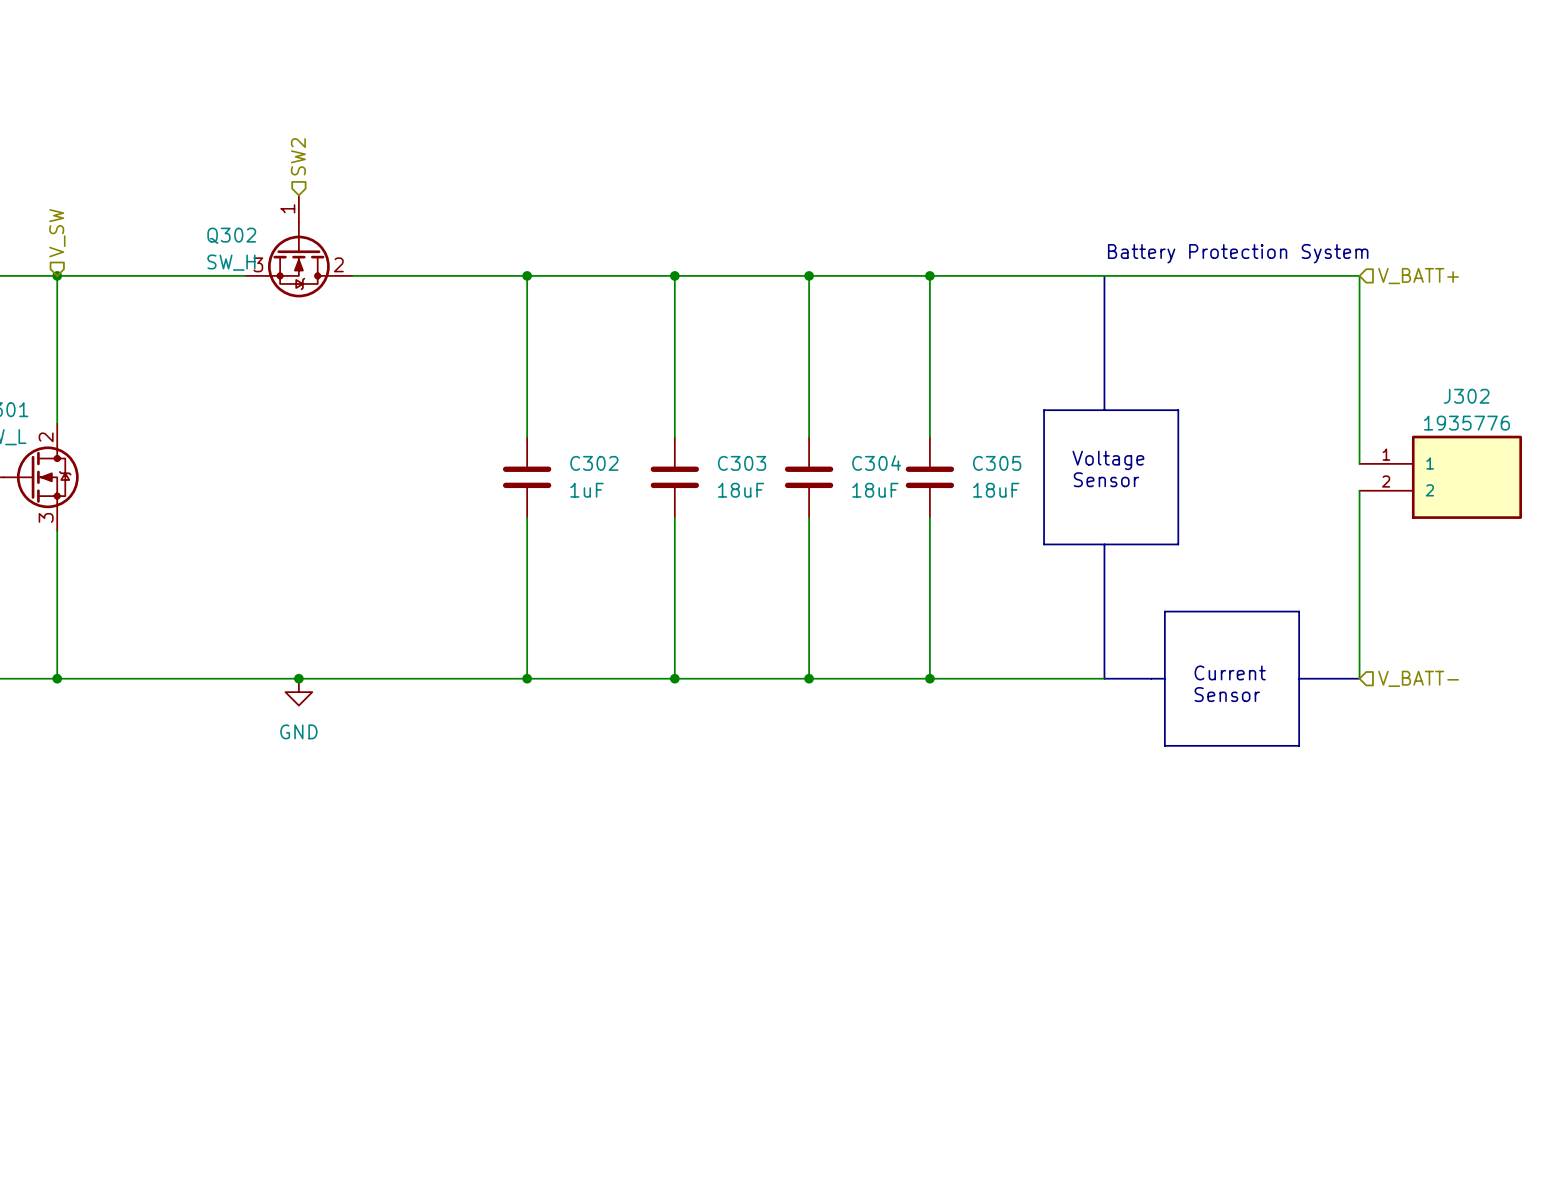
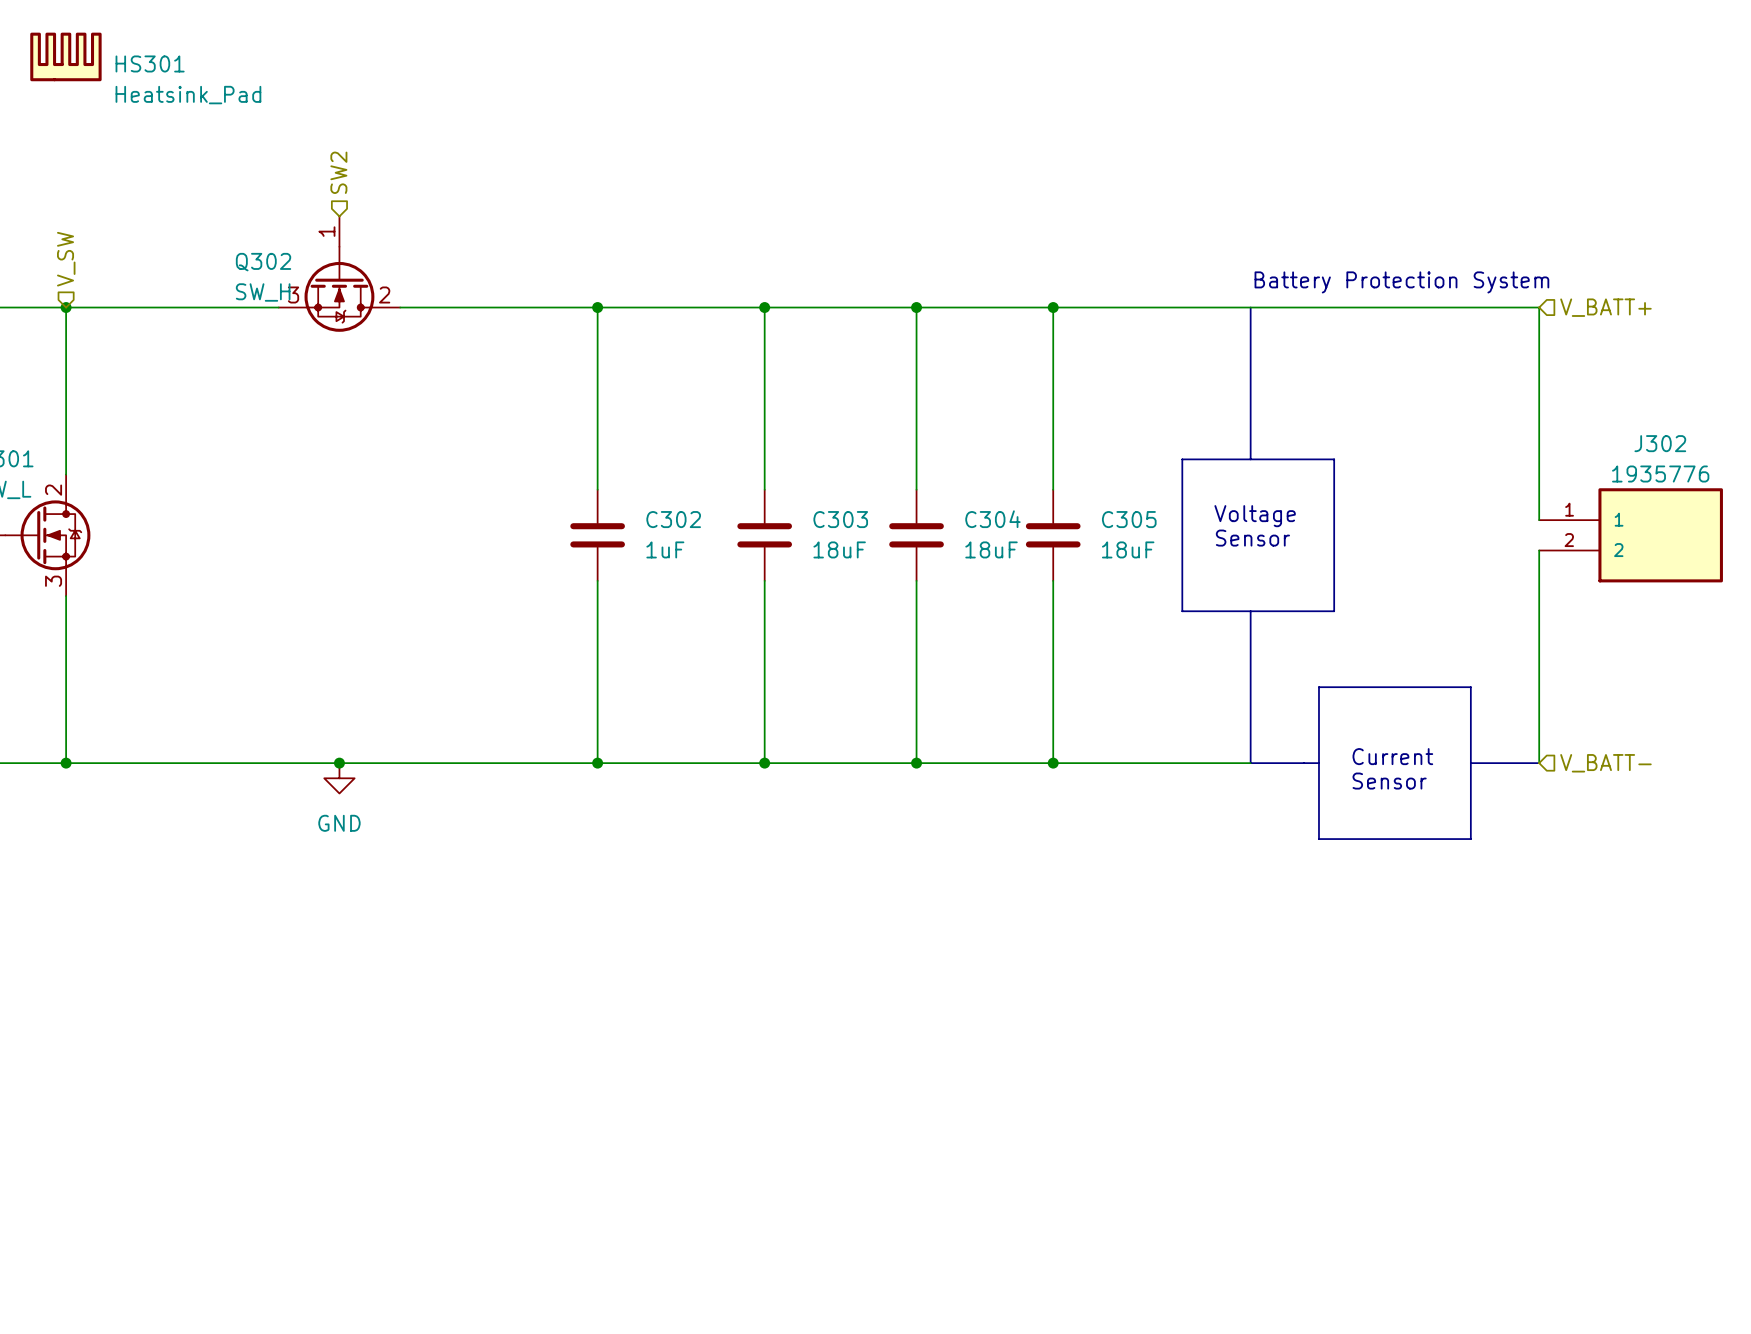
HS301: none -> Heatsink_Pad (65, 56)

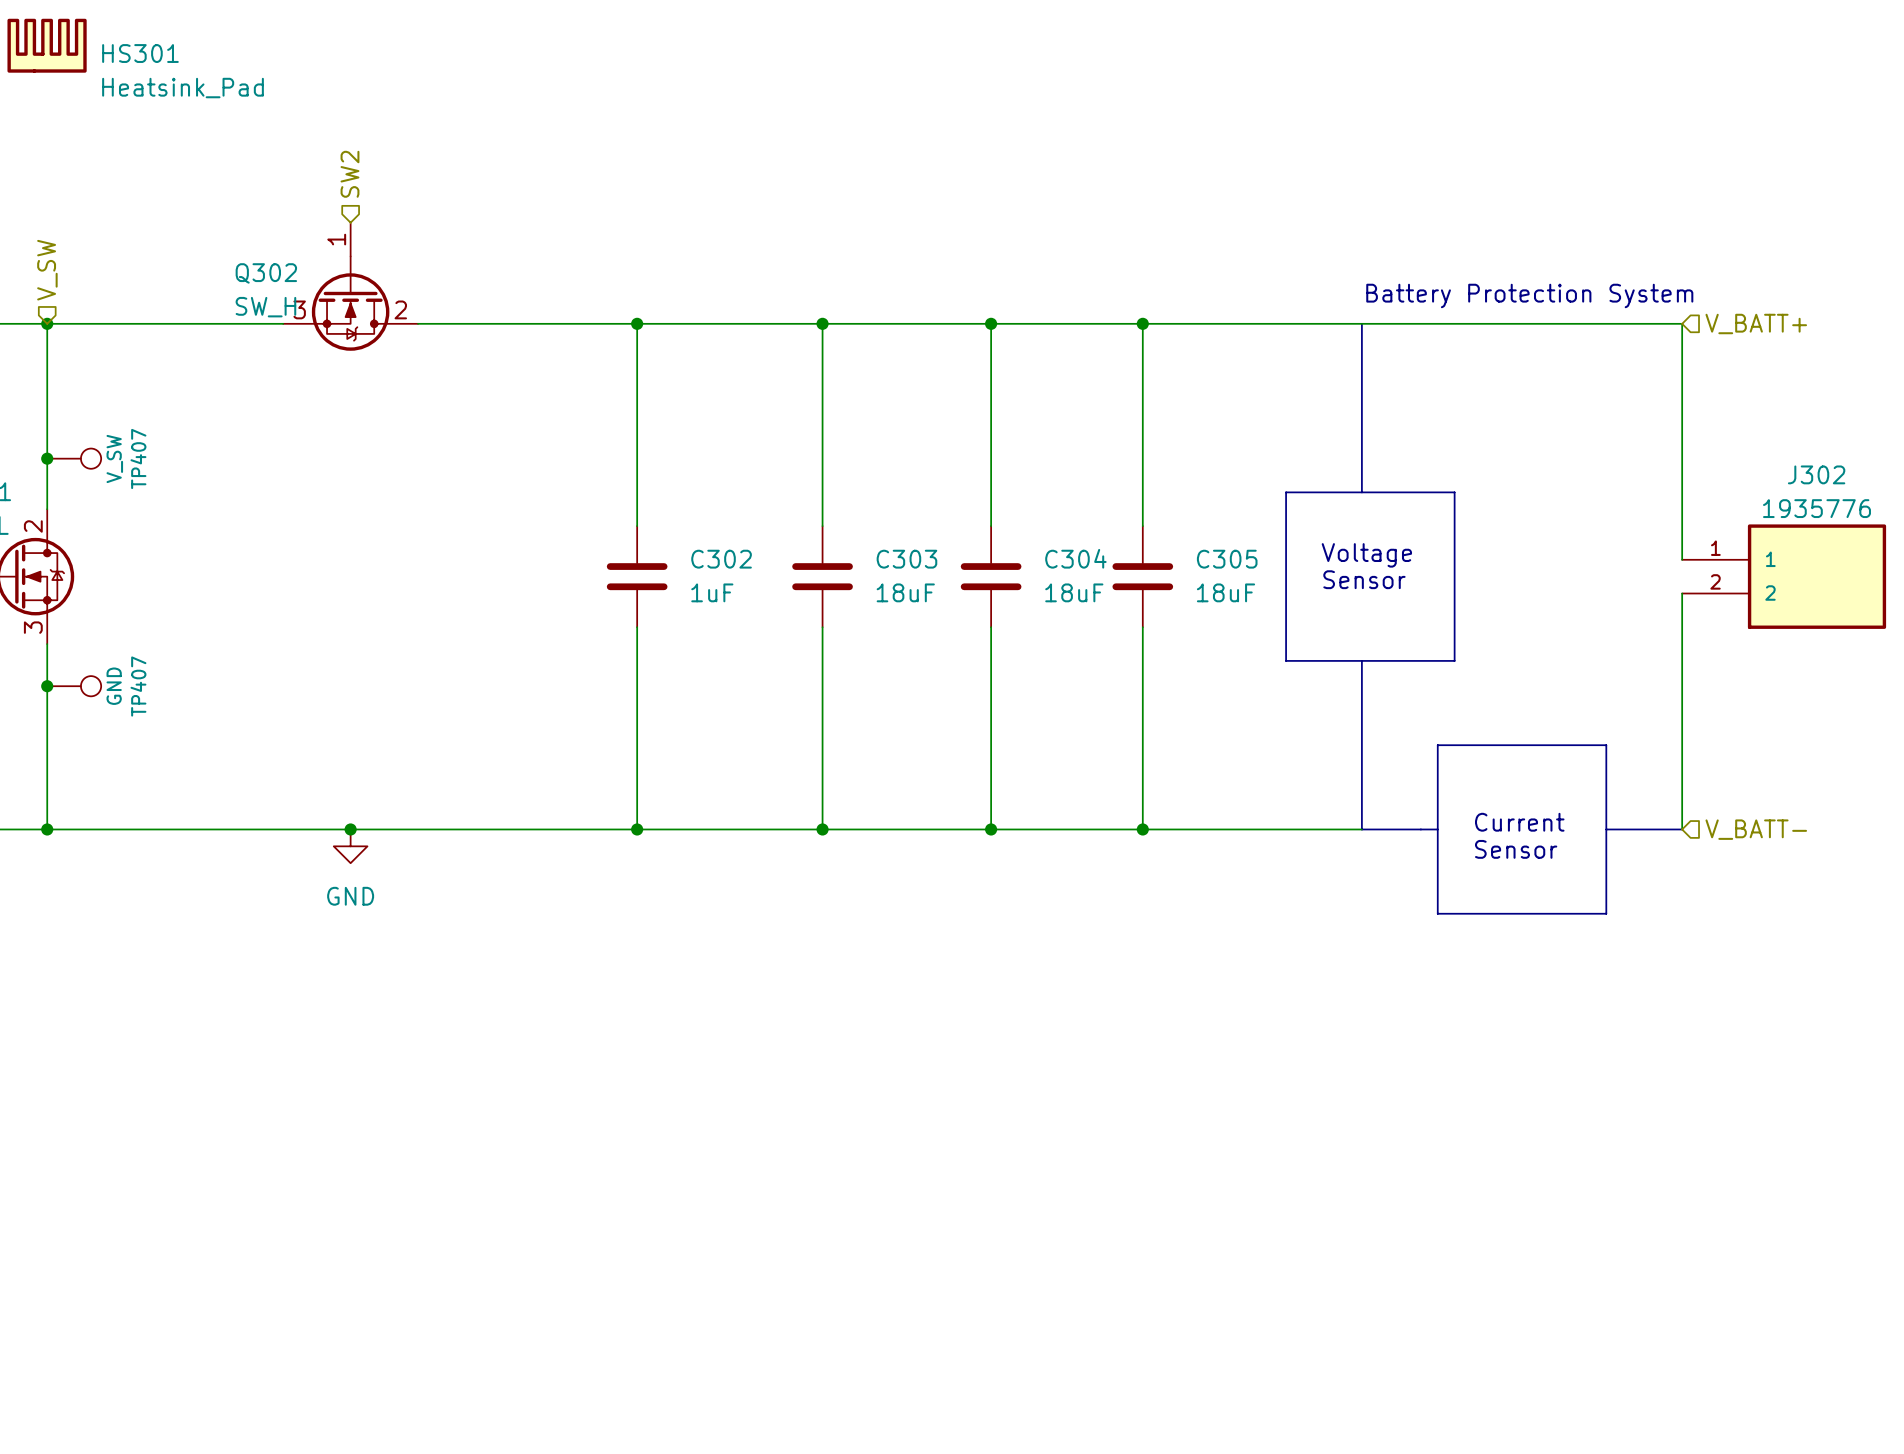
junction: none -> (47, 458)
TP407: none -> V_SW (74, 458)
junction: none -> (47, 686)
TP407: none -> GND (74, 686)

